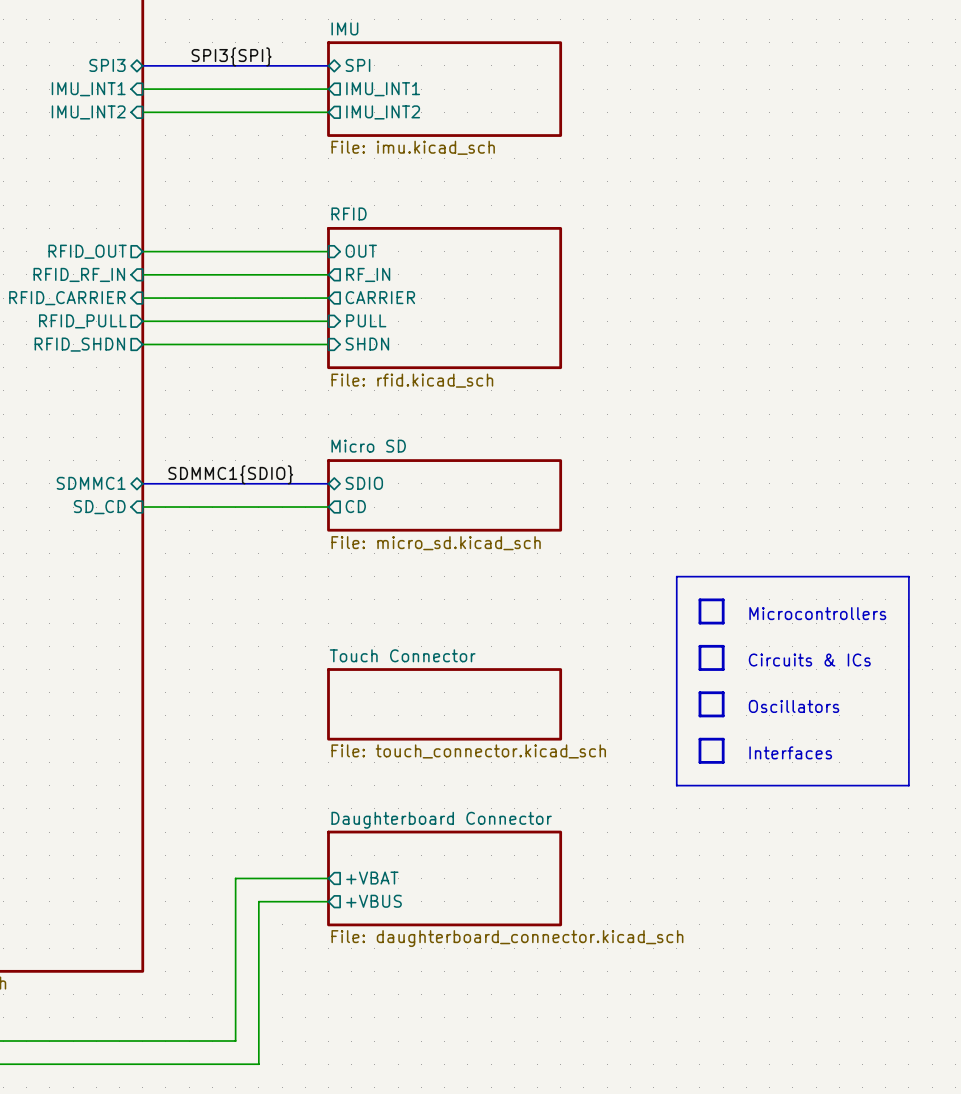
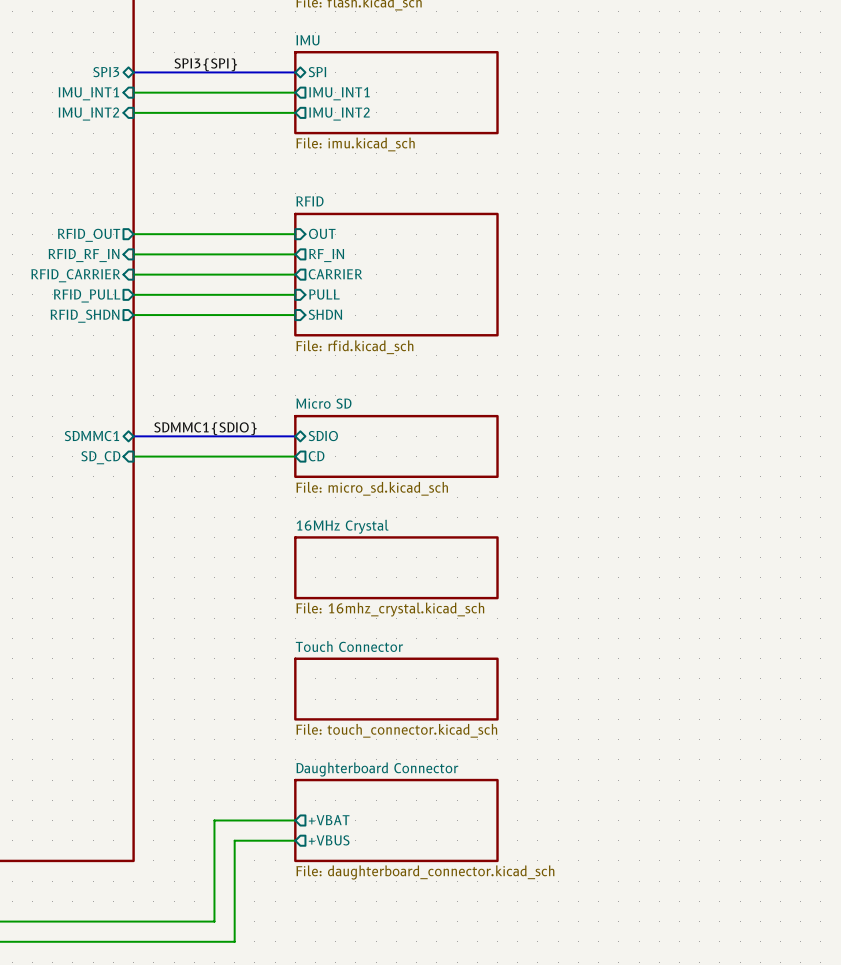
line: (676, 576) (908, 576) (908, 785) (676, 785) (676, 576) -> none
line: (699, 599) (699, 623) (723, 623) (723, 599) (699, 599) -> none
text: Microcontrollers (817, 613) -> none
sheet 16MHz Crystal: none -> File: 16mhz_crystal.kicad_sch (396, 567)
line: (699, 646) (699, 669) (723, 669) (723, 646) (699, 646) -> none
text: Circuits & ICs (809, 660) -> none
line: (699, 692) (723, 692) (723, 715) (699, 715) (699, 692) -> none
sheet Touch Connector position: (444, 704) -> (396, 689)
text: Oscillators (794, 706) -> none
line: (699, 739) (699, 762) (723, 762) (723, 739) (699, 739) -> none
text: Interfaces (790, 752) -> none
wire: (328, 878) (235, 878) (235, 924) -> (295, 820) (214, 820)
sheet pin position: +VBAT (372, 878) -> +VBAT (329, 820)
sheet Daughterboard Connector position: (444, 878) -> (396, 820)
wire: (328, 901) (258, 901) (258, 948) -> (295, 840) (234, 840)
sheet pin position: +VBUS (374, 901) -> +VBUS (329, 840)

